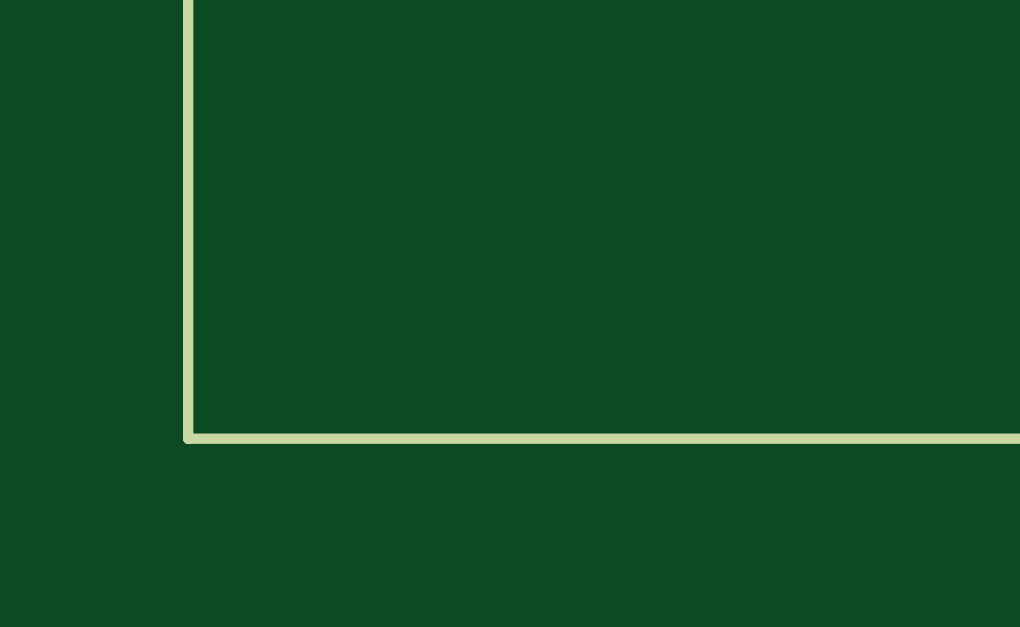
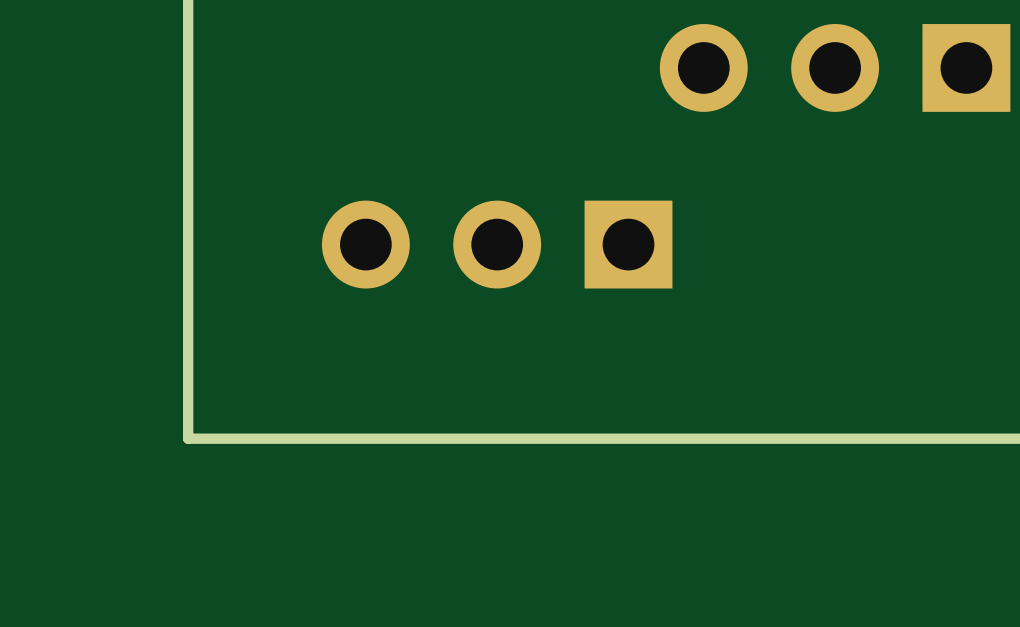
part: none -> (835, 67)
part: none -> (497, 244)

